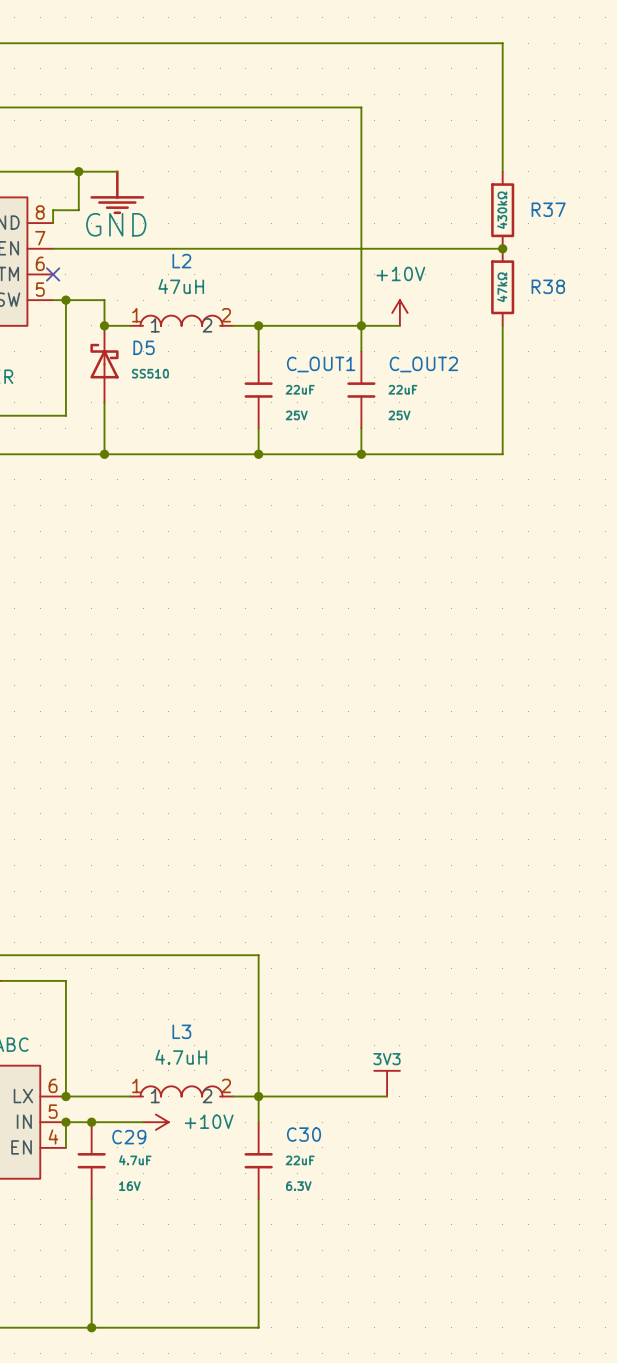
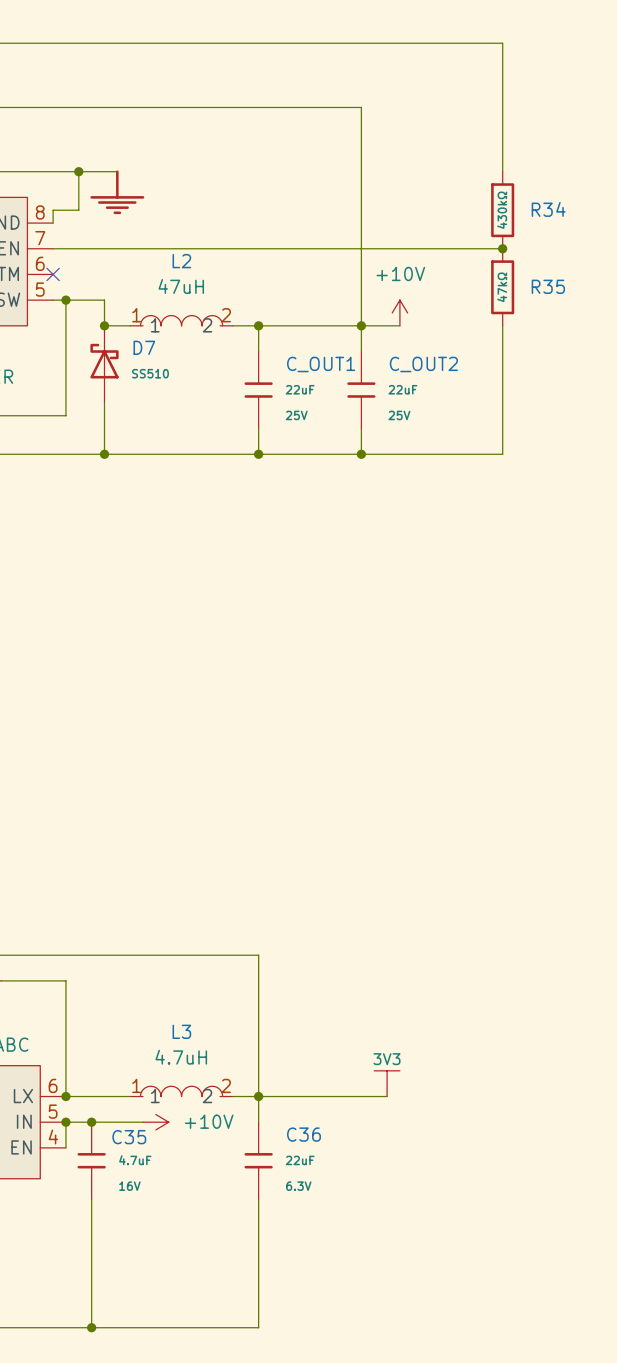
R37 name: R37 (548, 209) -> R34 (548, 209)
power symbol text: GND (116, 224) -> none
R38 name: R38 (548, 286) -> R35 (548, 286)
D5 name: D5 (144, 347) -> D7 (144, 347)
C30 name: C30 (303, 1134) -> C36 (303, 1134)
C29 name: C29 (129, 1137) -> C35 (129, 1137)

